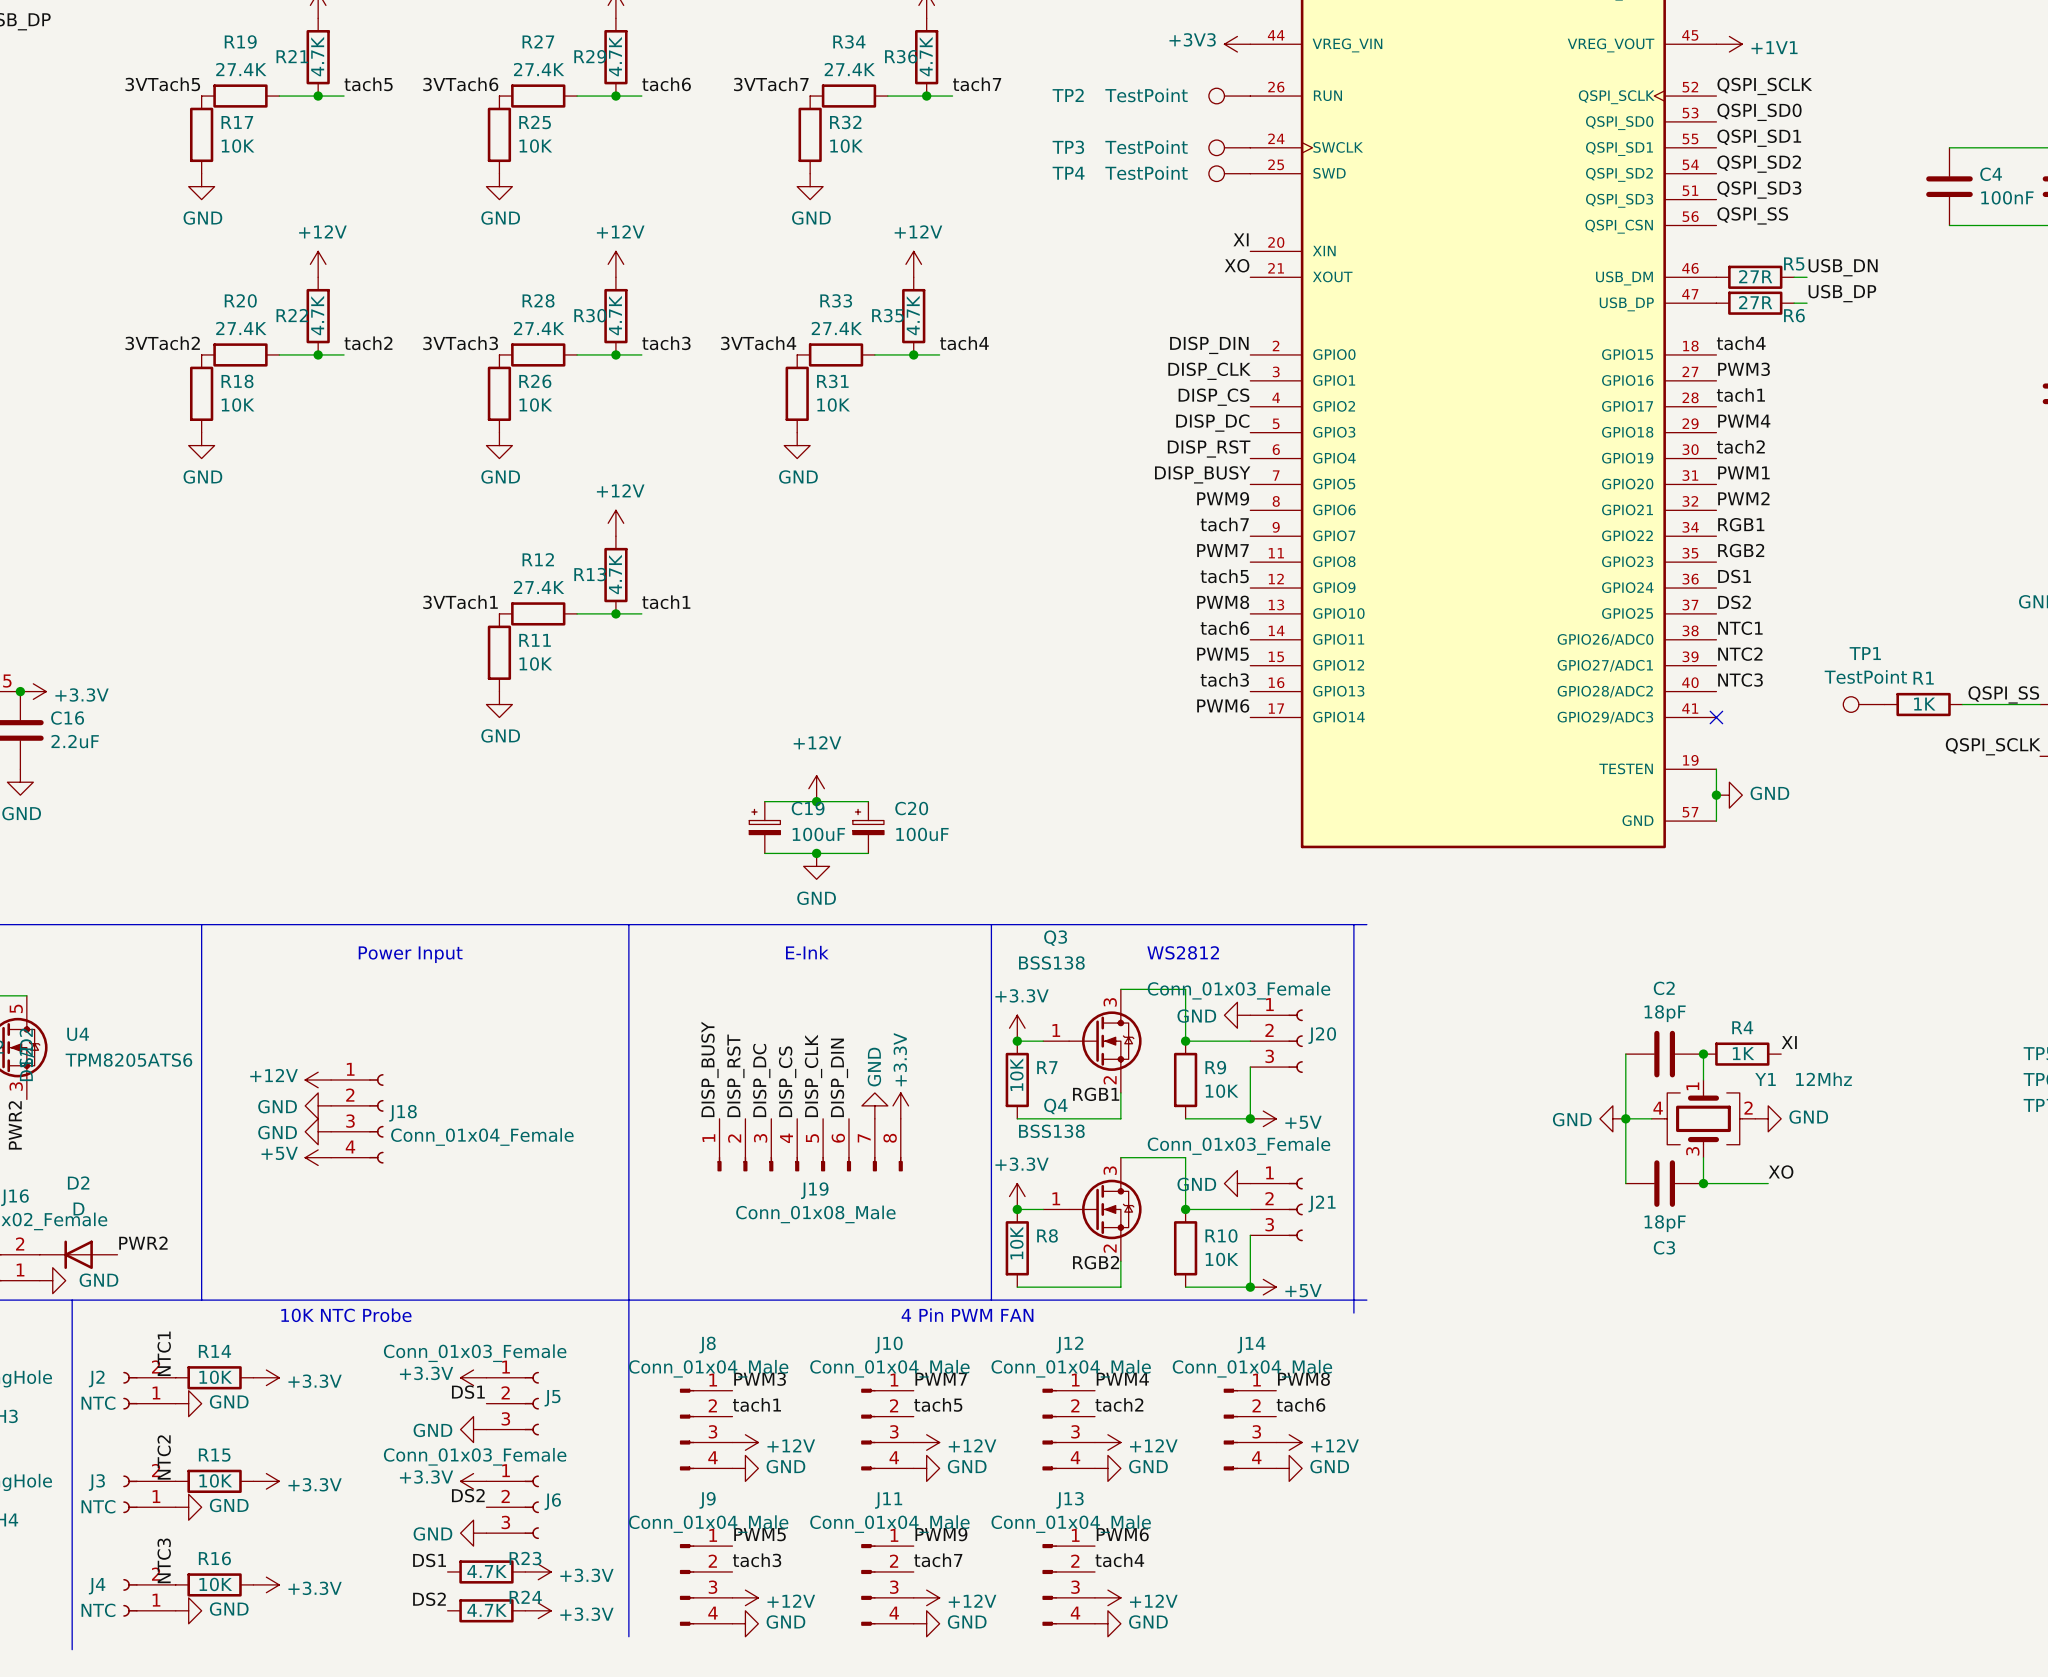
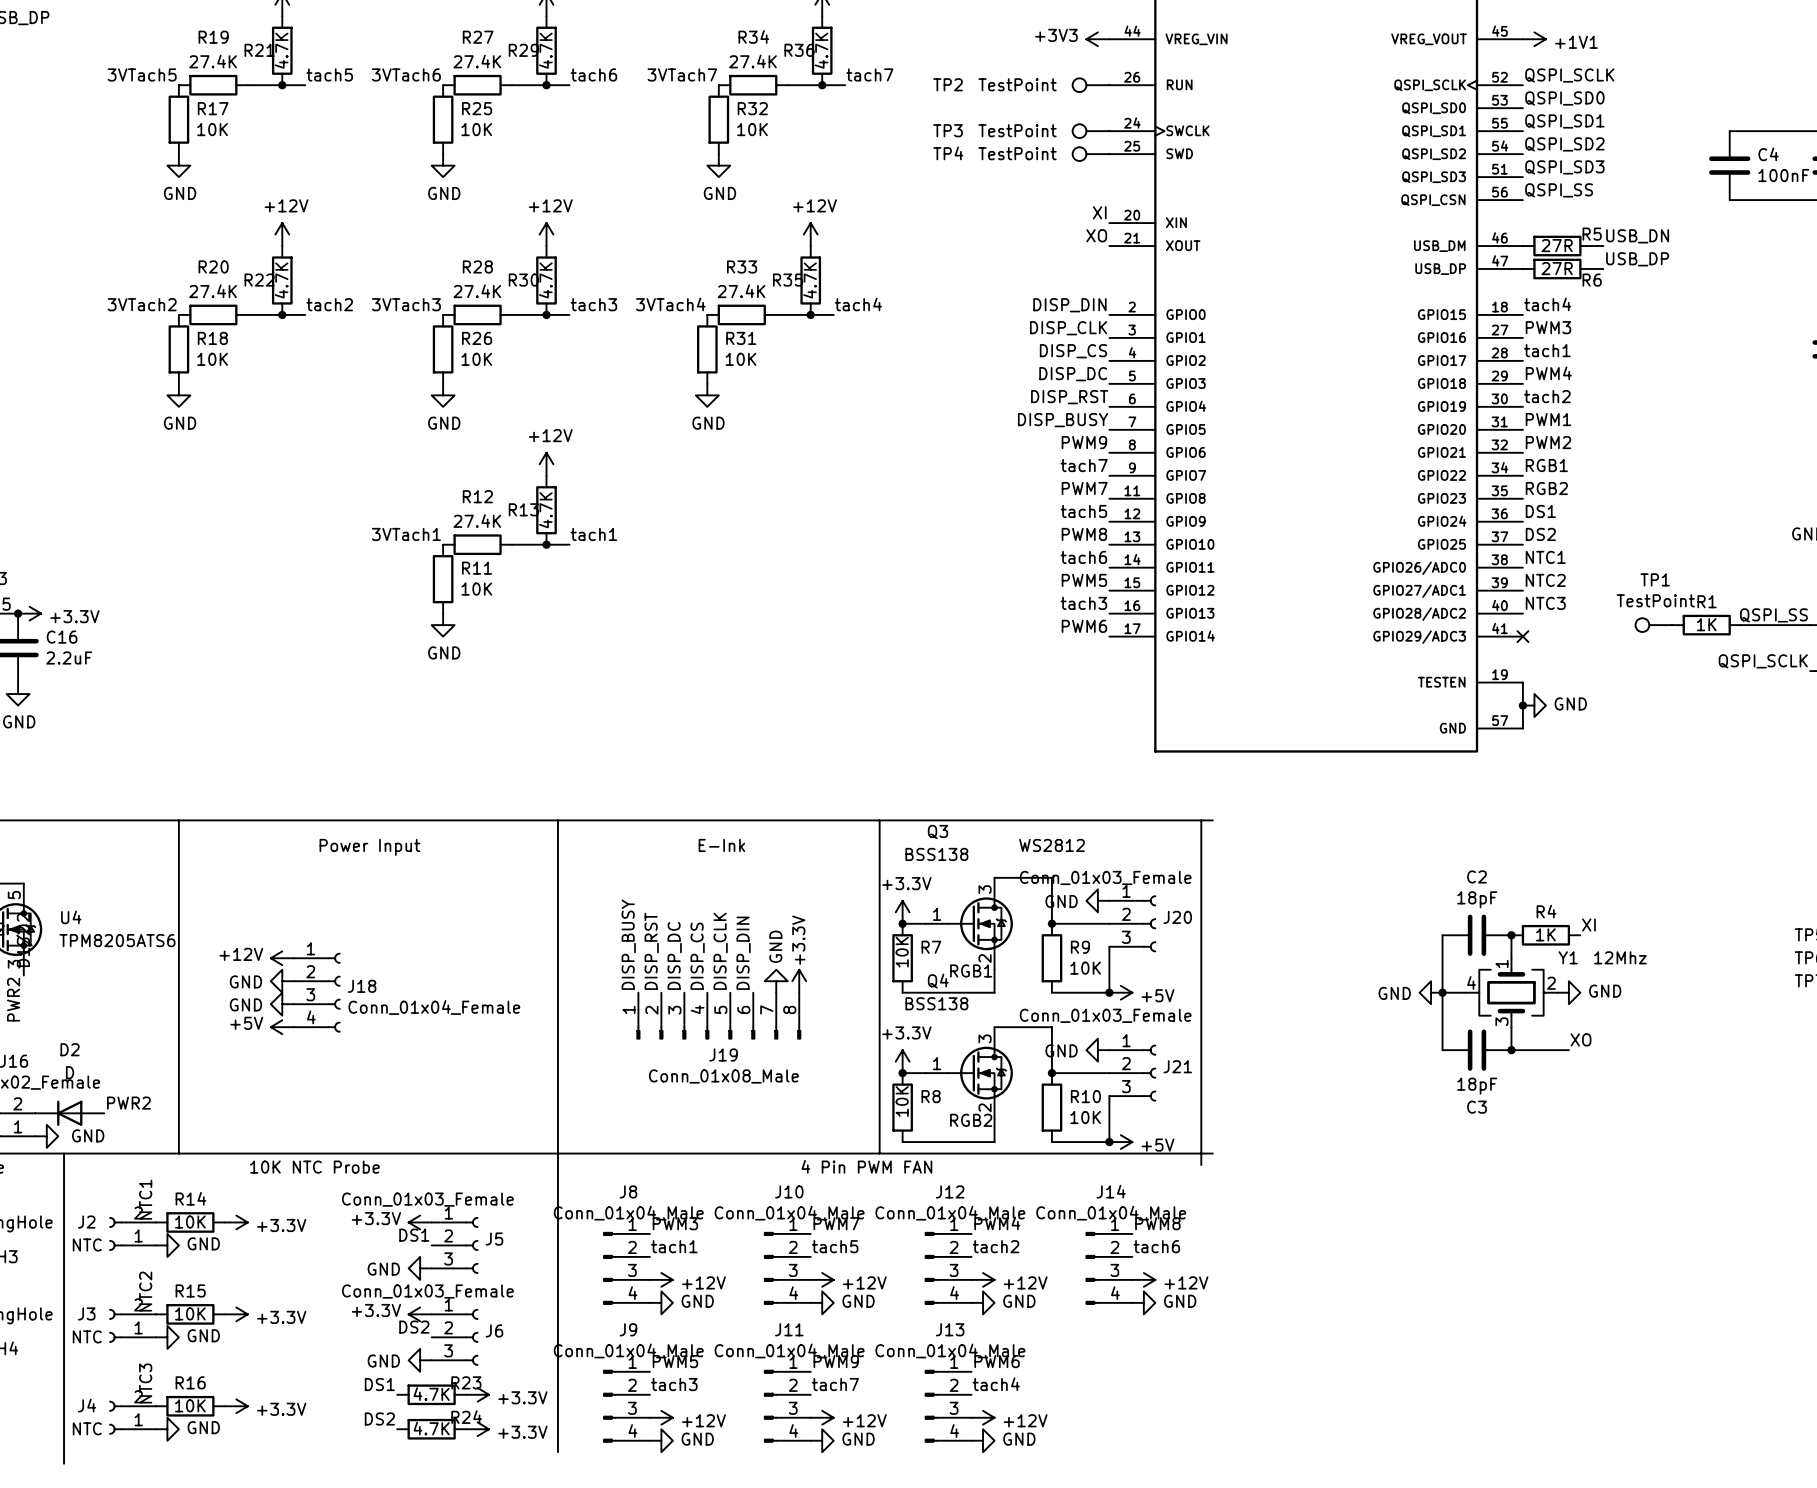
power symbol: +12V (816, 788) -> none
wire: (764, 801) (868, 801) -> none
junction: (816, 801) -> none
C19: 100uF (764, 827) -> none
C20: 100uF (868, 827) -> none
wire: (764, 853) (868, 853) -> none
junction: (816, 853) -> none
power symbol: GND (816, 866) -> none

